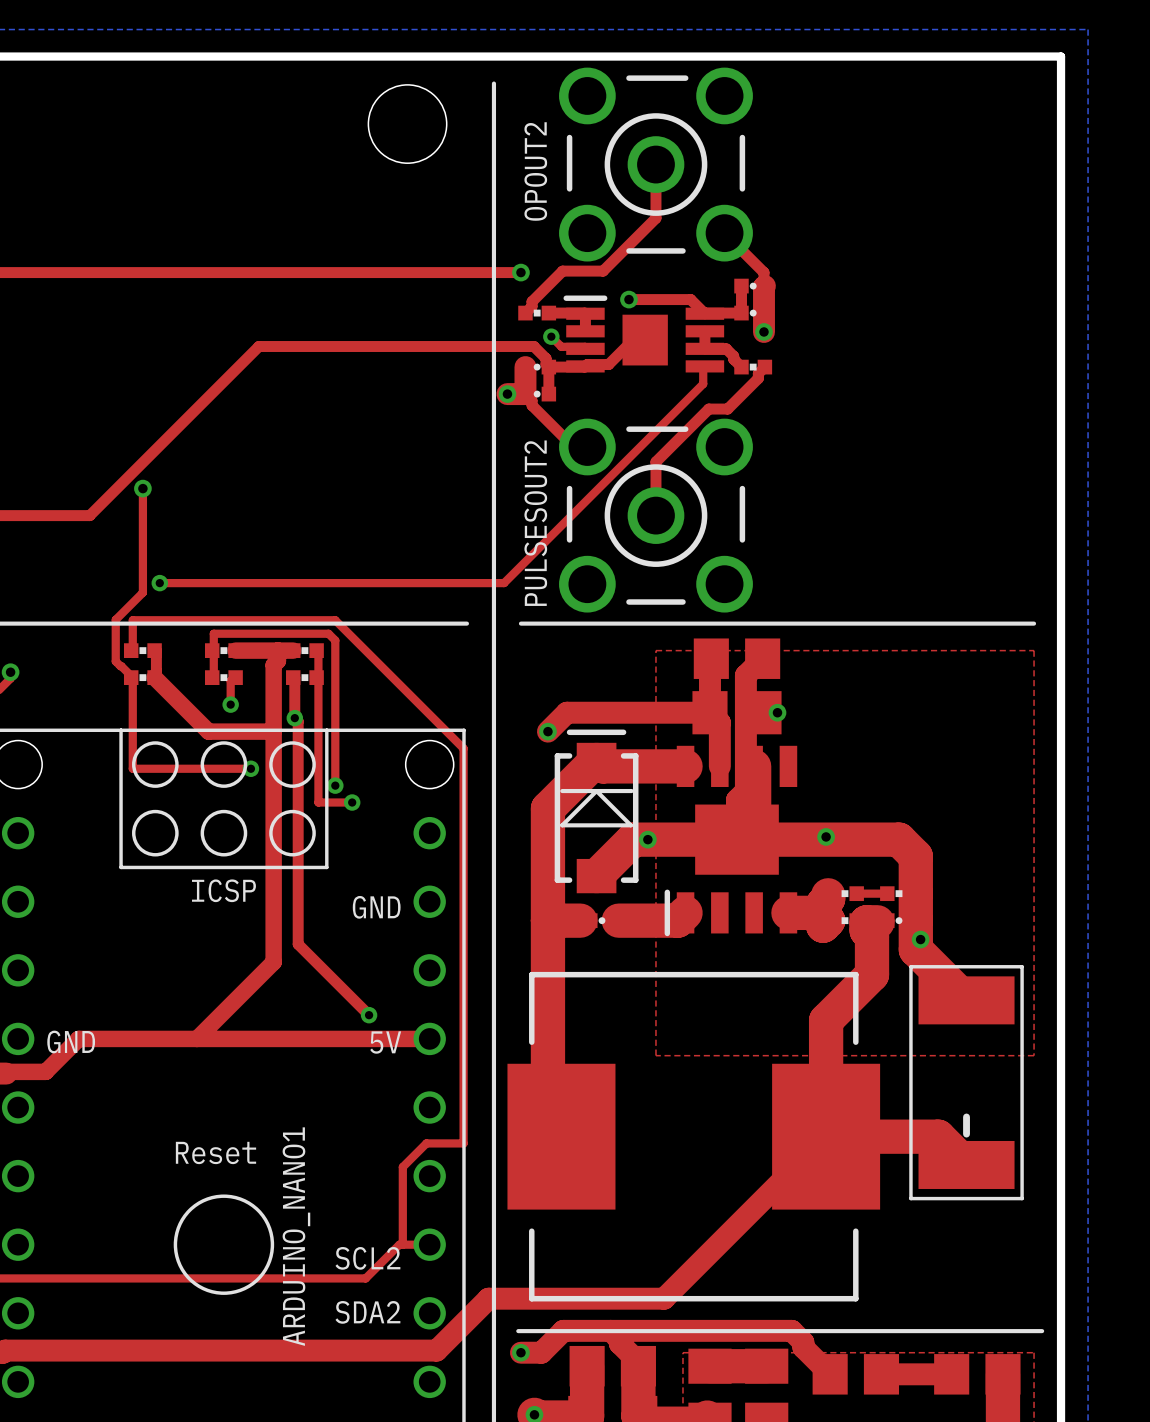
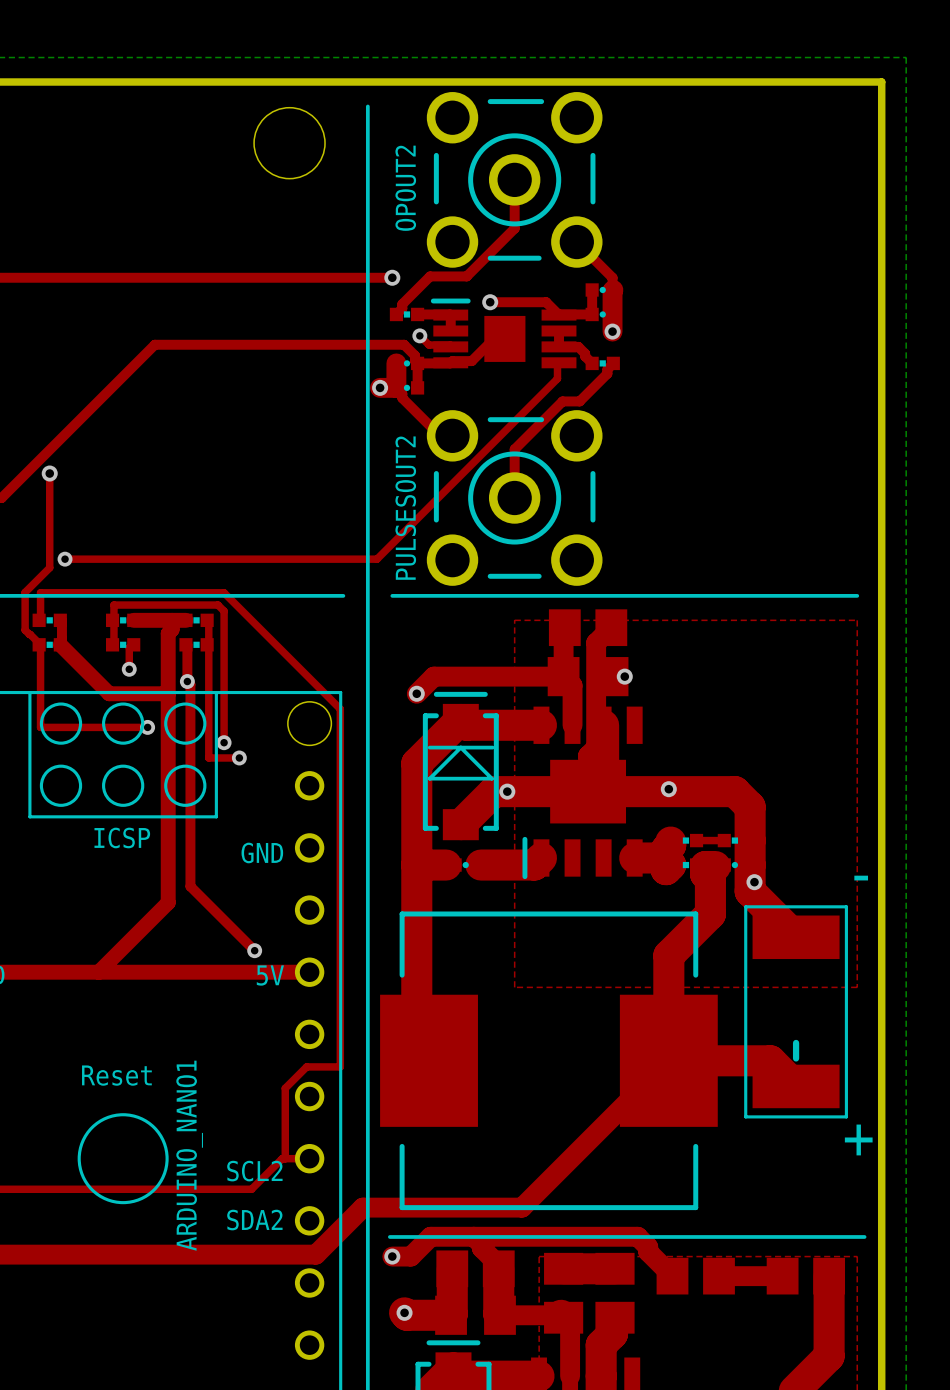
text: none -> - (861, 878)
text: none -> + (858, 1139)

